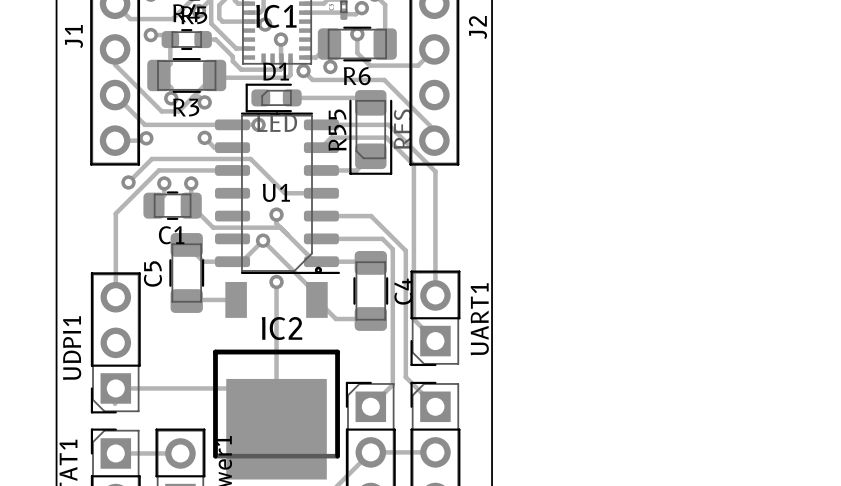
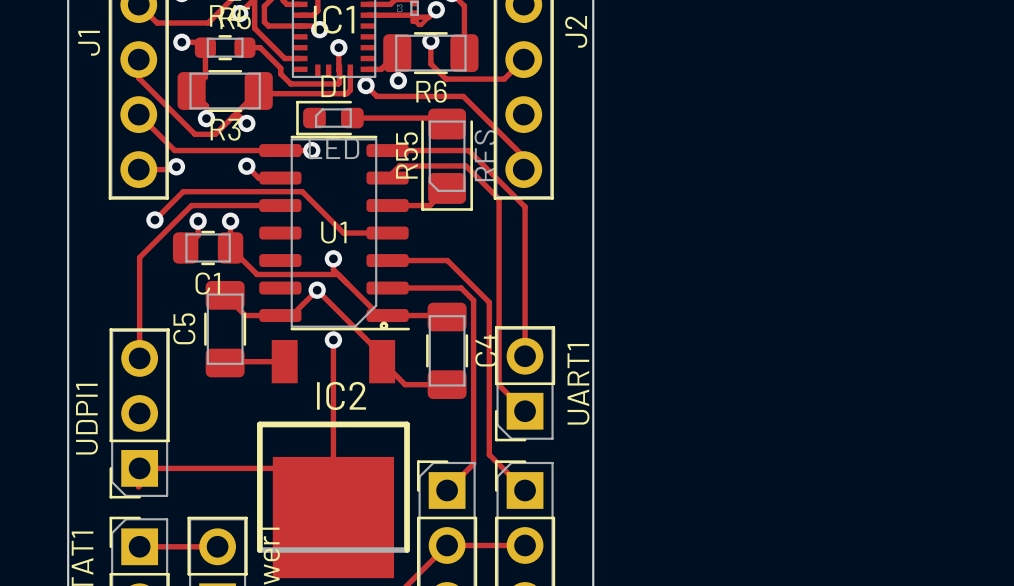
track: none -> (414, 17) (414, 20) (418, 24) (428, 17)

